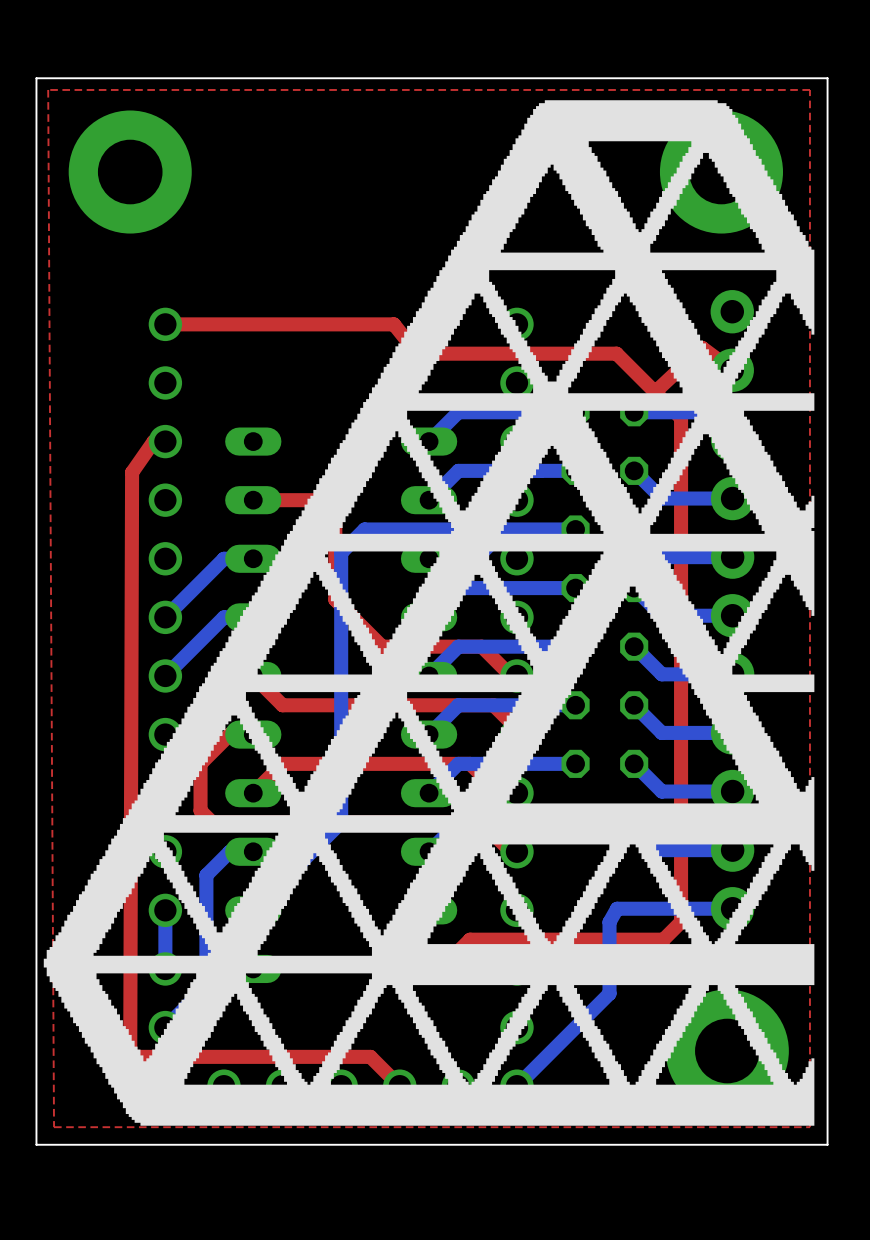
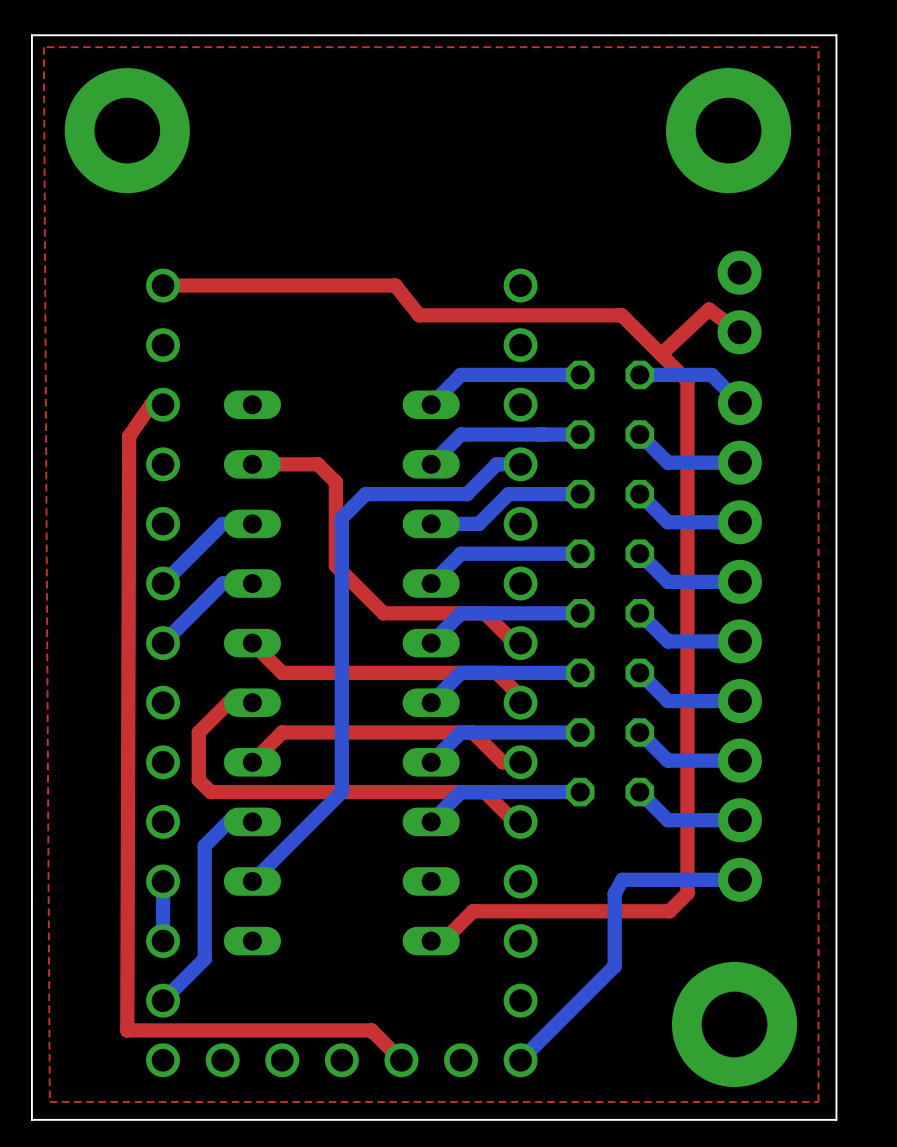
drawing: [43, 100, 815, 1126] -> none

